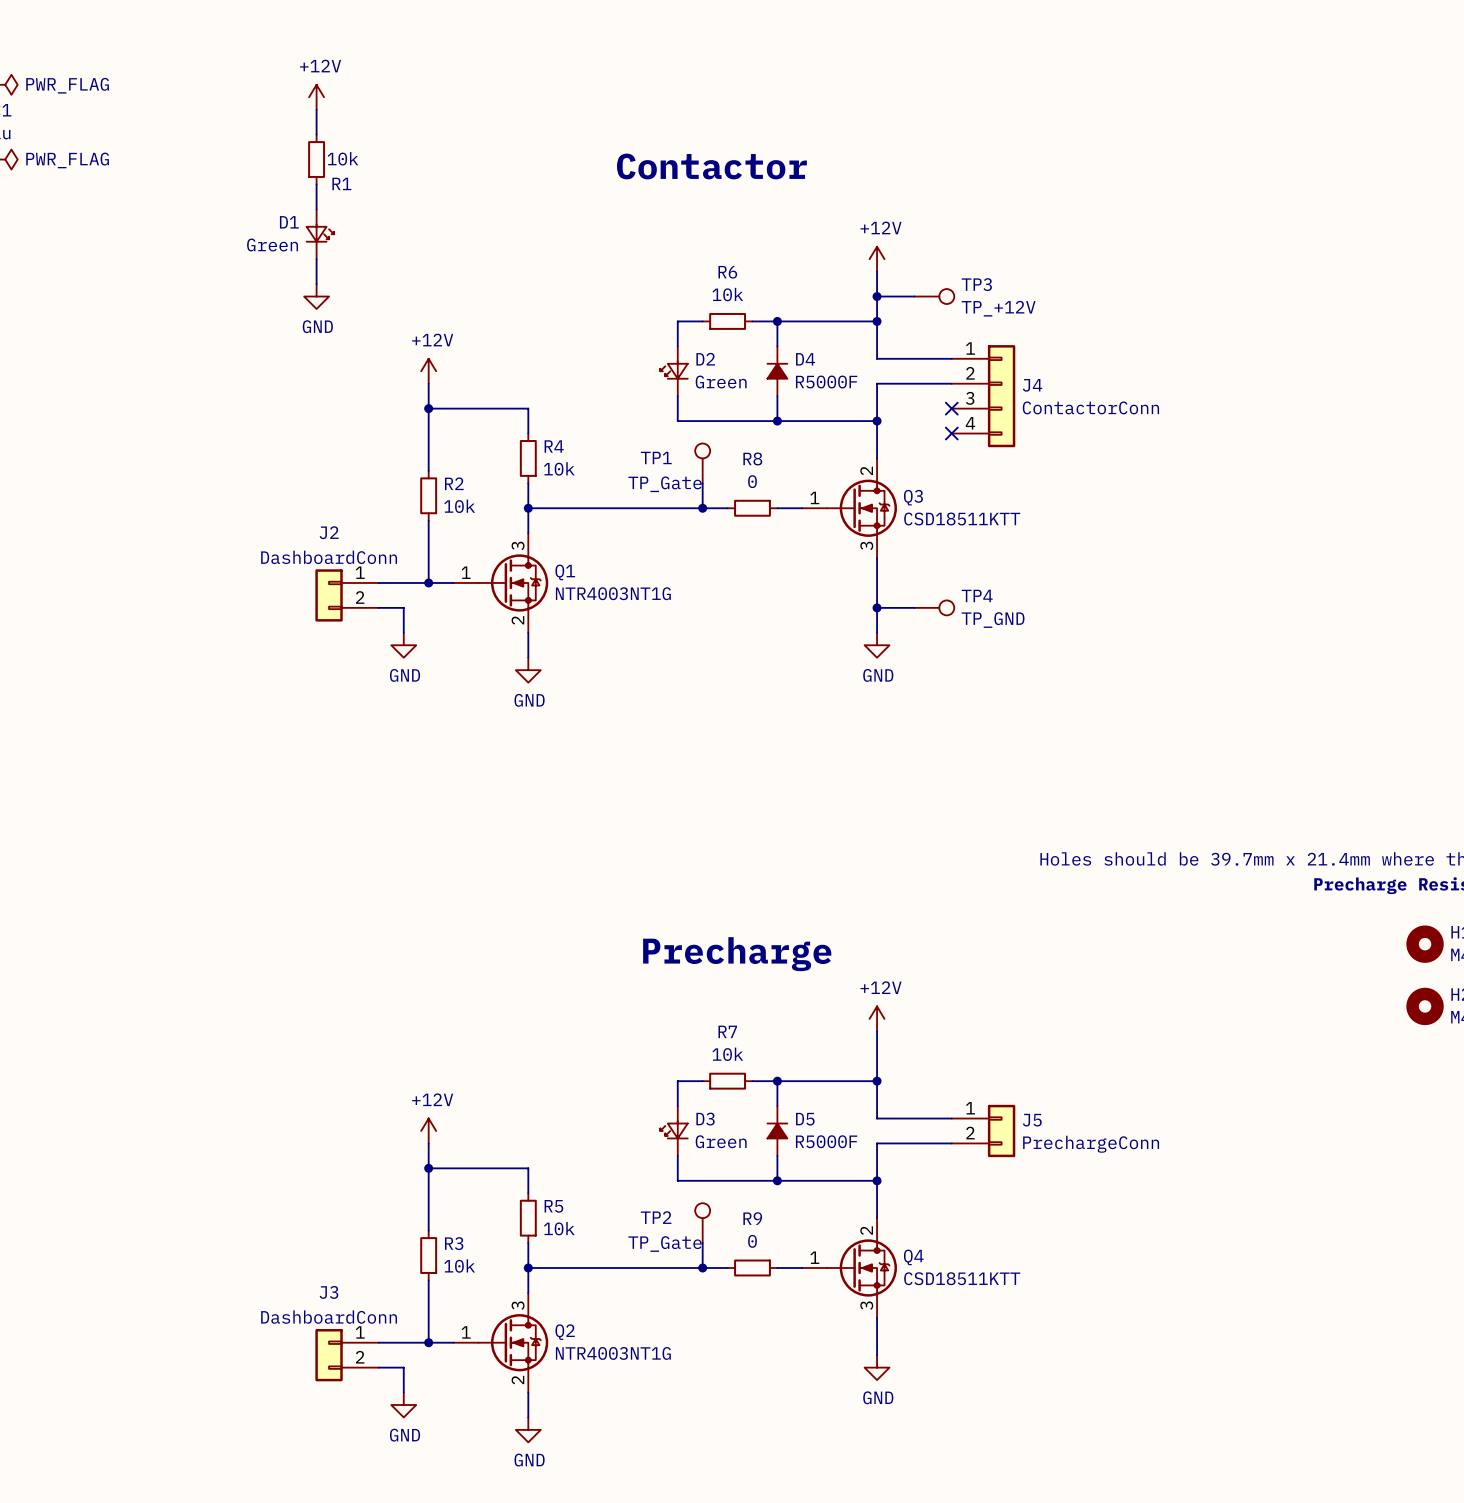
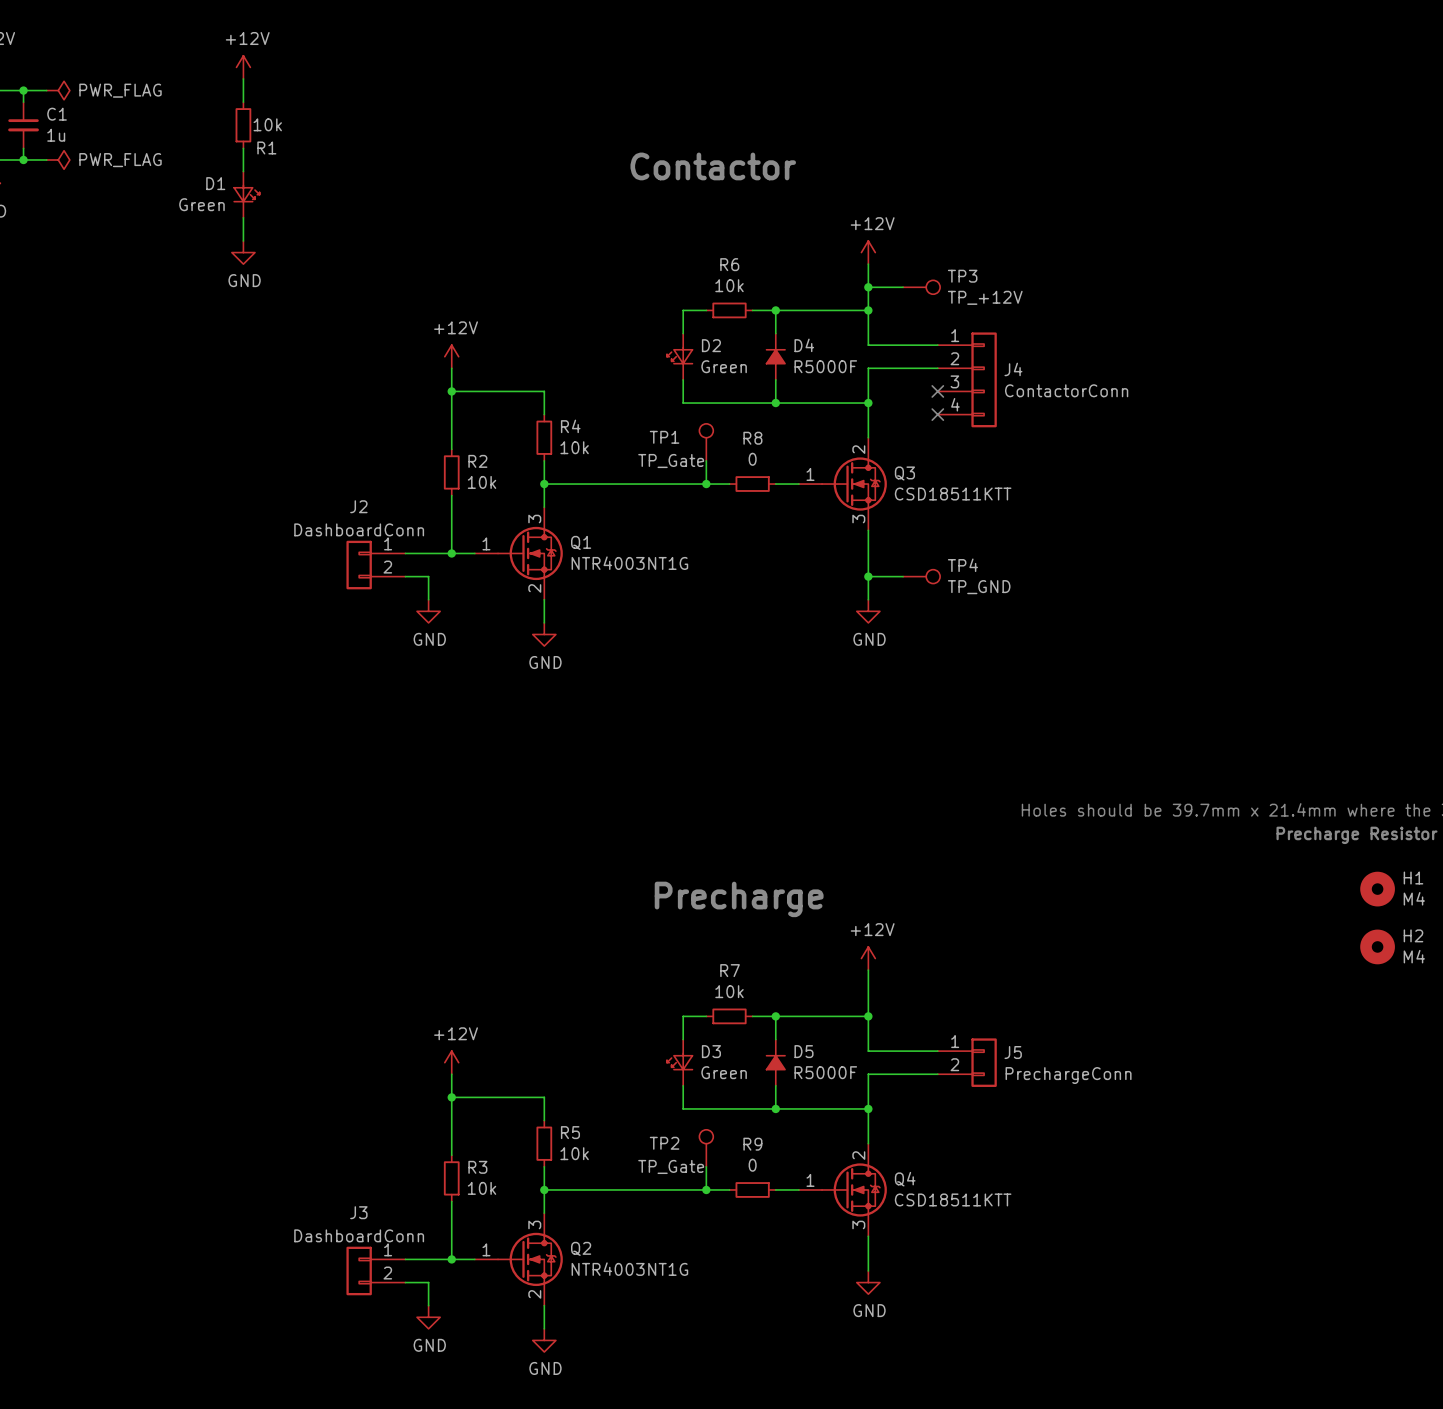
power symbol position: +12V (316, 97) -> +12V (243, 67)
wire: (316, 109) (316, 134) -> (243, 148) (243, 171)
R1 position: (316, 159) -> (243, 125)
wire: (316, 184) (316, 209) -> (243, 78) (243, 102)
D1 position: (320, 234) -> (246, 194)
wire: (316, 259) (316, 284) -> (243, 217) (243, 241)
power symbol position: GND (316, 296) -> GND (243, 252)

